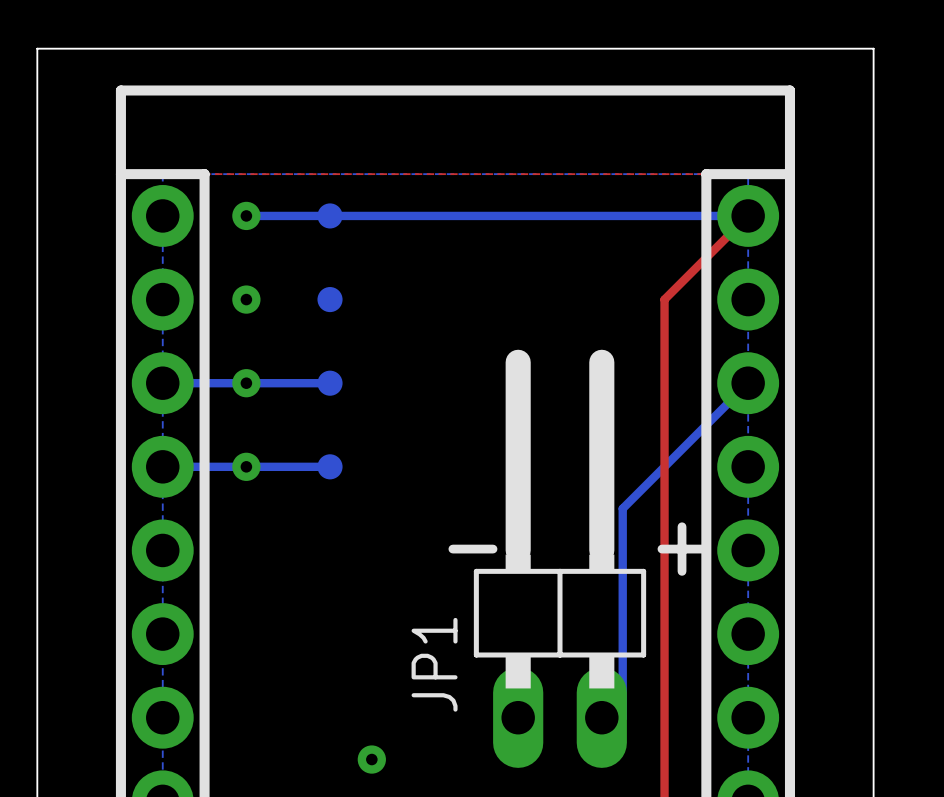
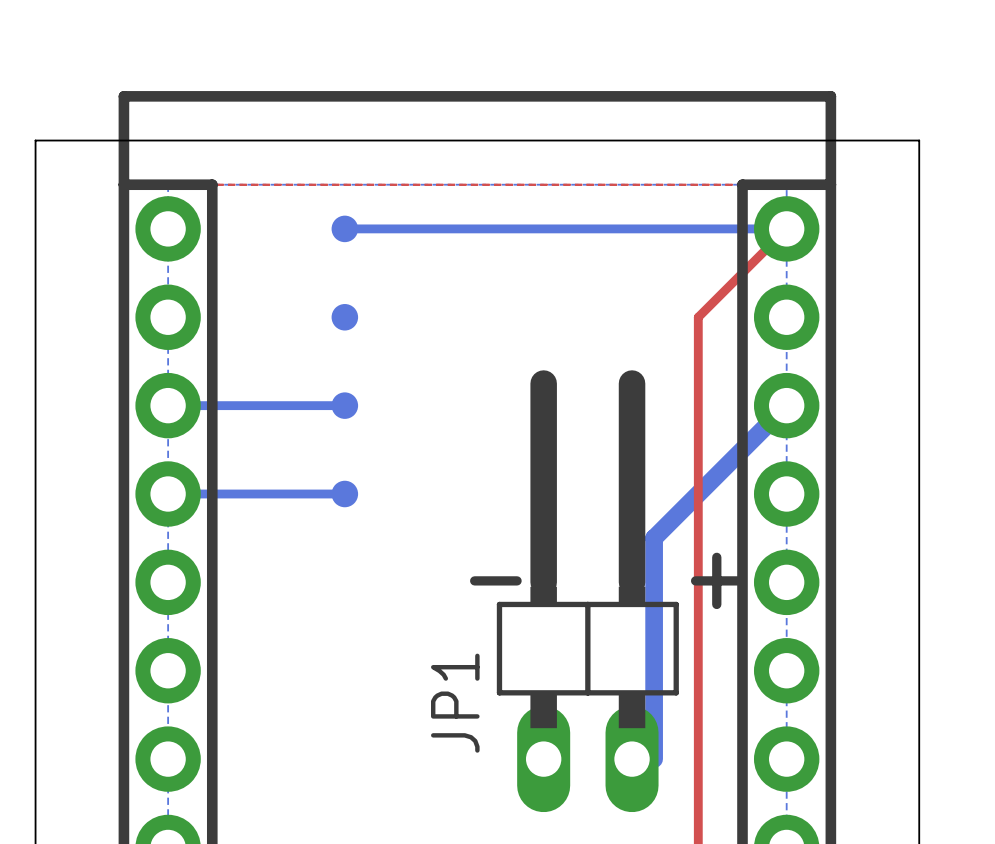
board edge: (37, 132) (37, 48) (873, 48) (873, 132) -> (35, 140) (919, 140)
bottom track: (246, 215) (330, 215) -> none
via: (246, 215) -> none
via: (246, 299) -> none
via: (246, 383) -> none
bottom track width: thin (748, 383) (622, 508) (622, 717) -> thick (786, 405) (654, 538) (654, 759)
via: (246, 466) -> none
via: (371, 759) -> none

